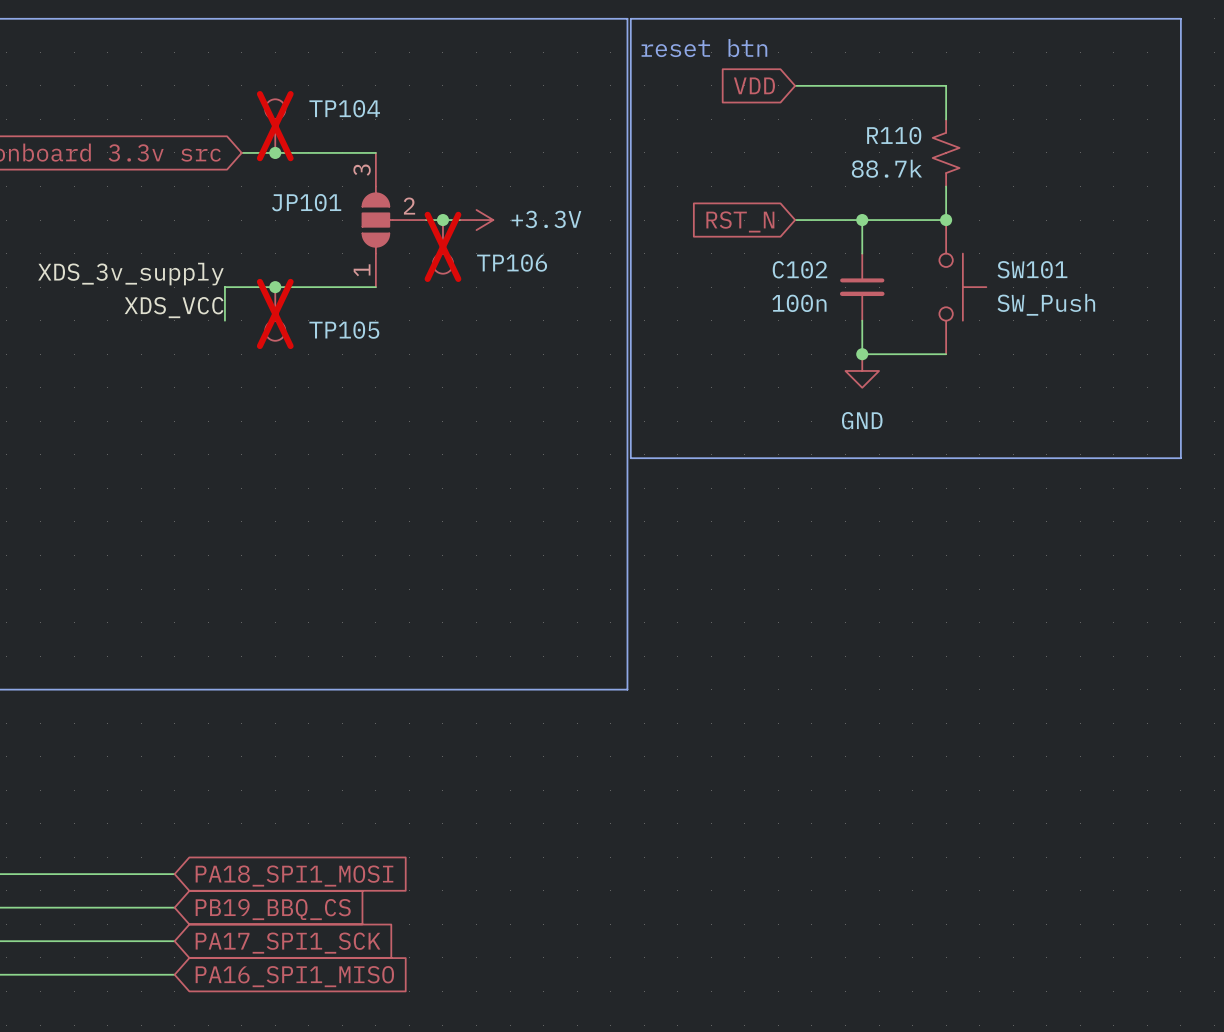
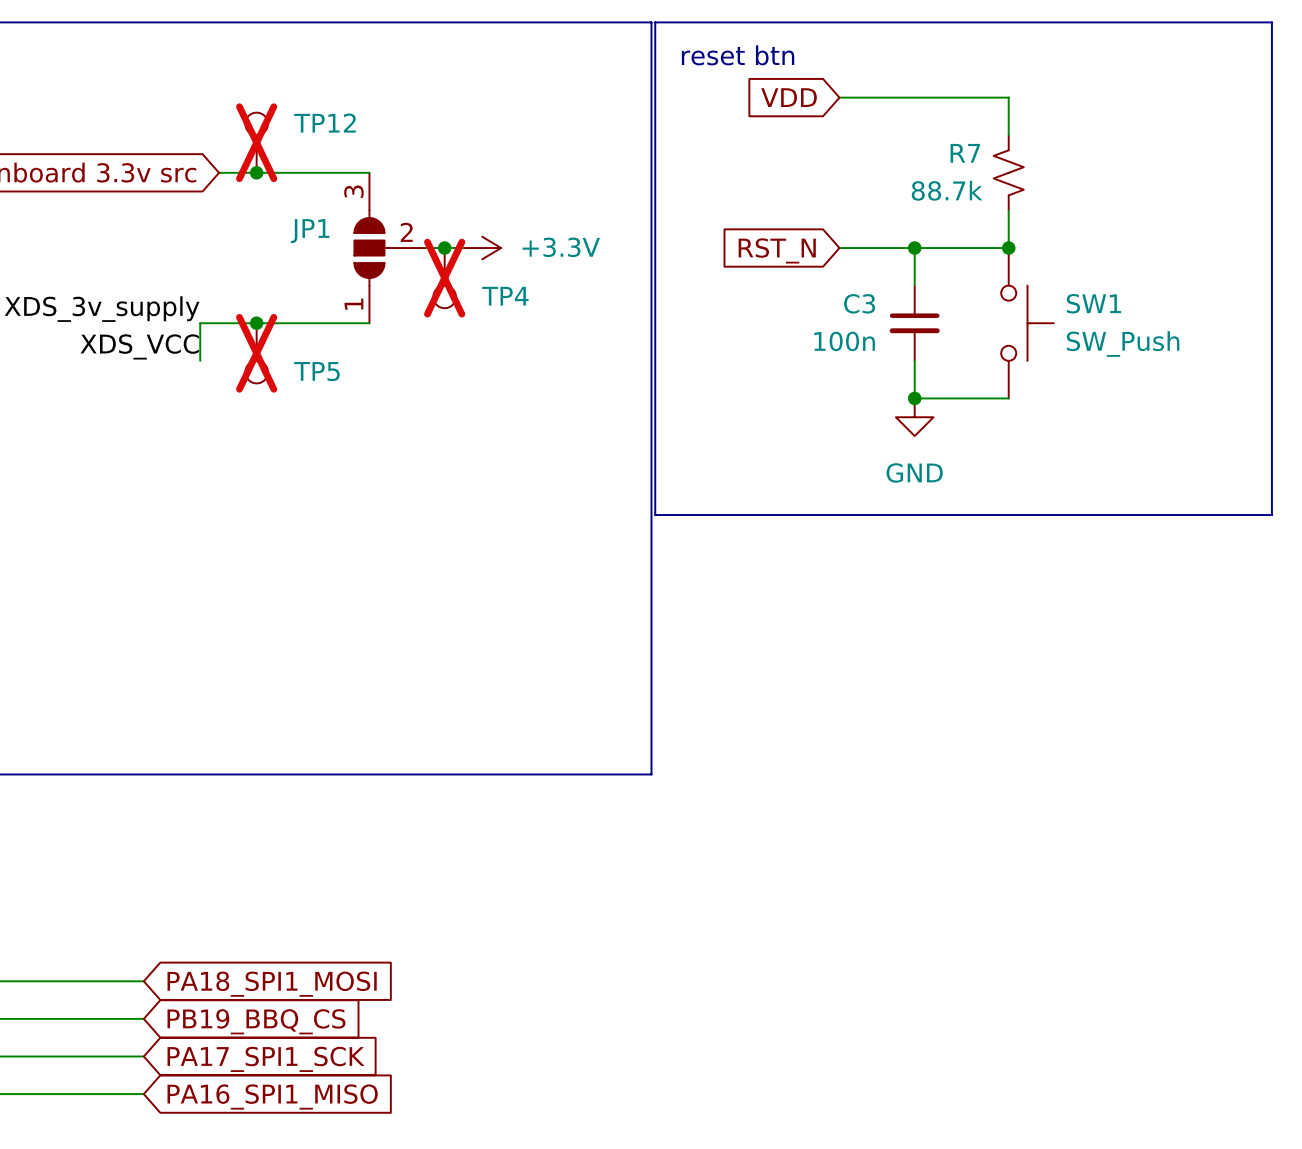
TP104 name: TP104 (344, 108) -> TP12 (324, 123)
R110 name: R110 (894, 135) -> R7 (965, 153)
JP101 name: JP101 (306, 202) -> JP1 (310, 231)
TP106 name: TP106 (512, 263) -> TP4 (505, 296)
C102 name: C102 (799, 269) -> C3 (859, 303)
SW101 name: SW101 (1032, 269) -> SW1 (1093, 303)
TP105 name: TP105 (344, 330) -> TP5 (316, 371)

